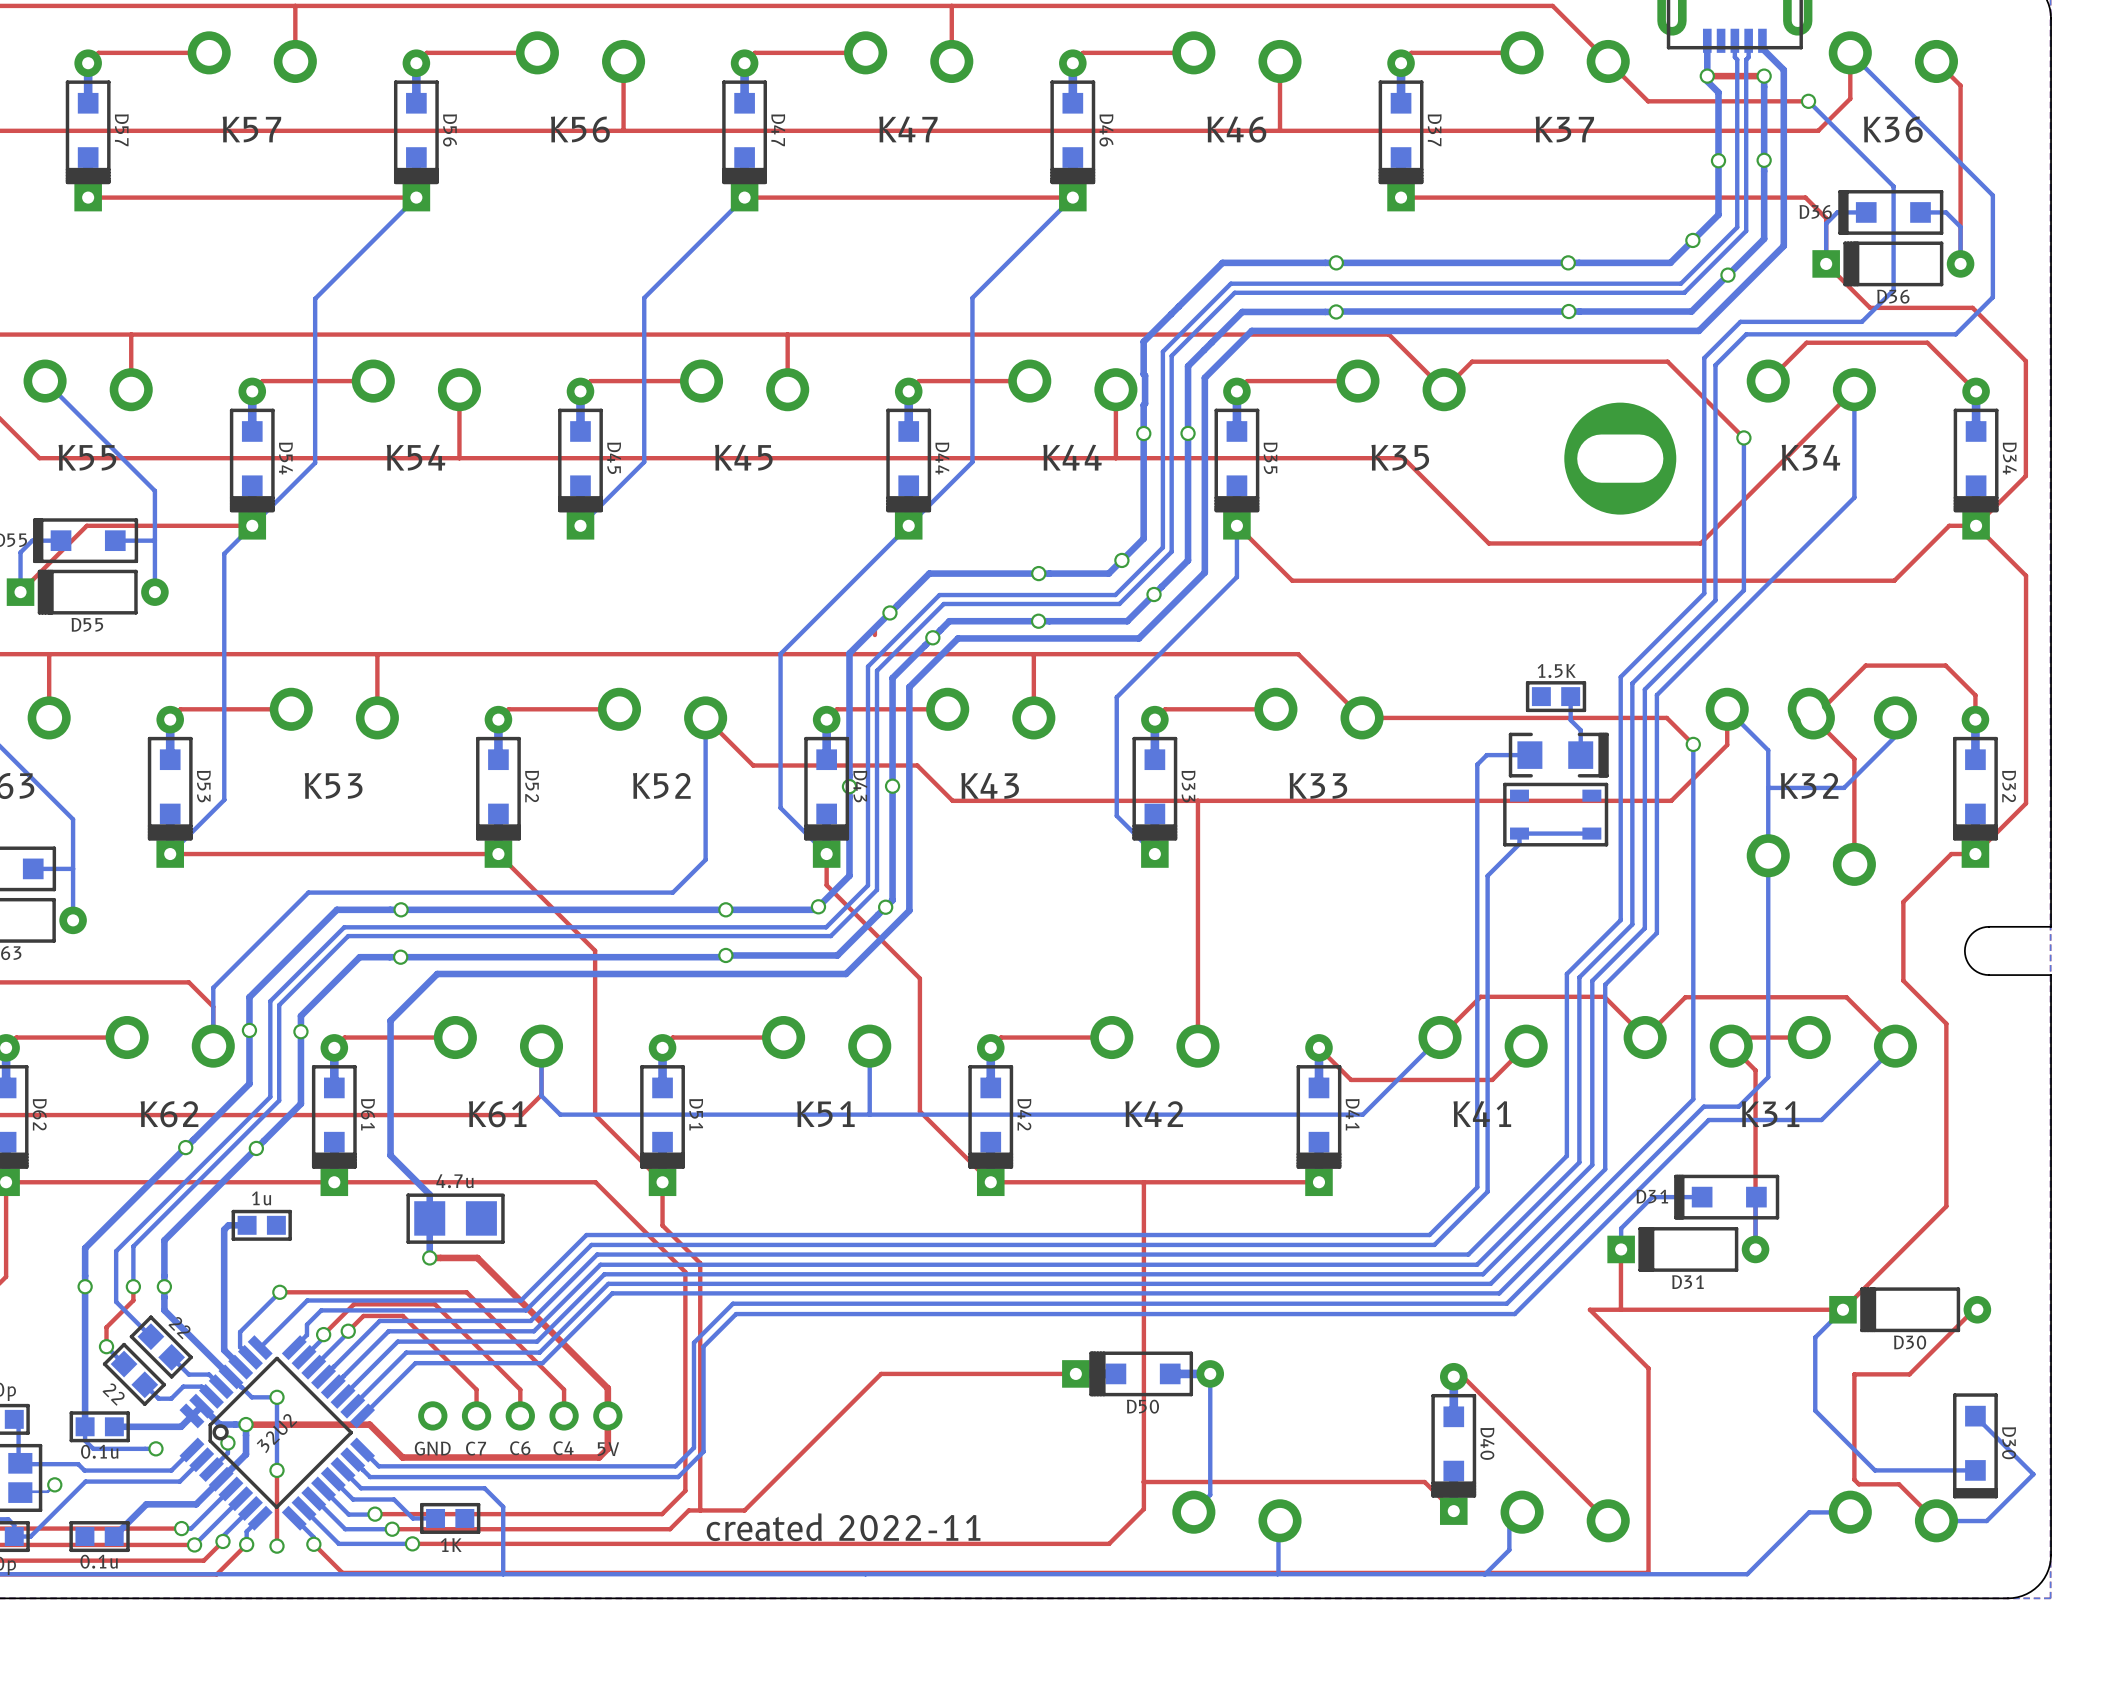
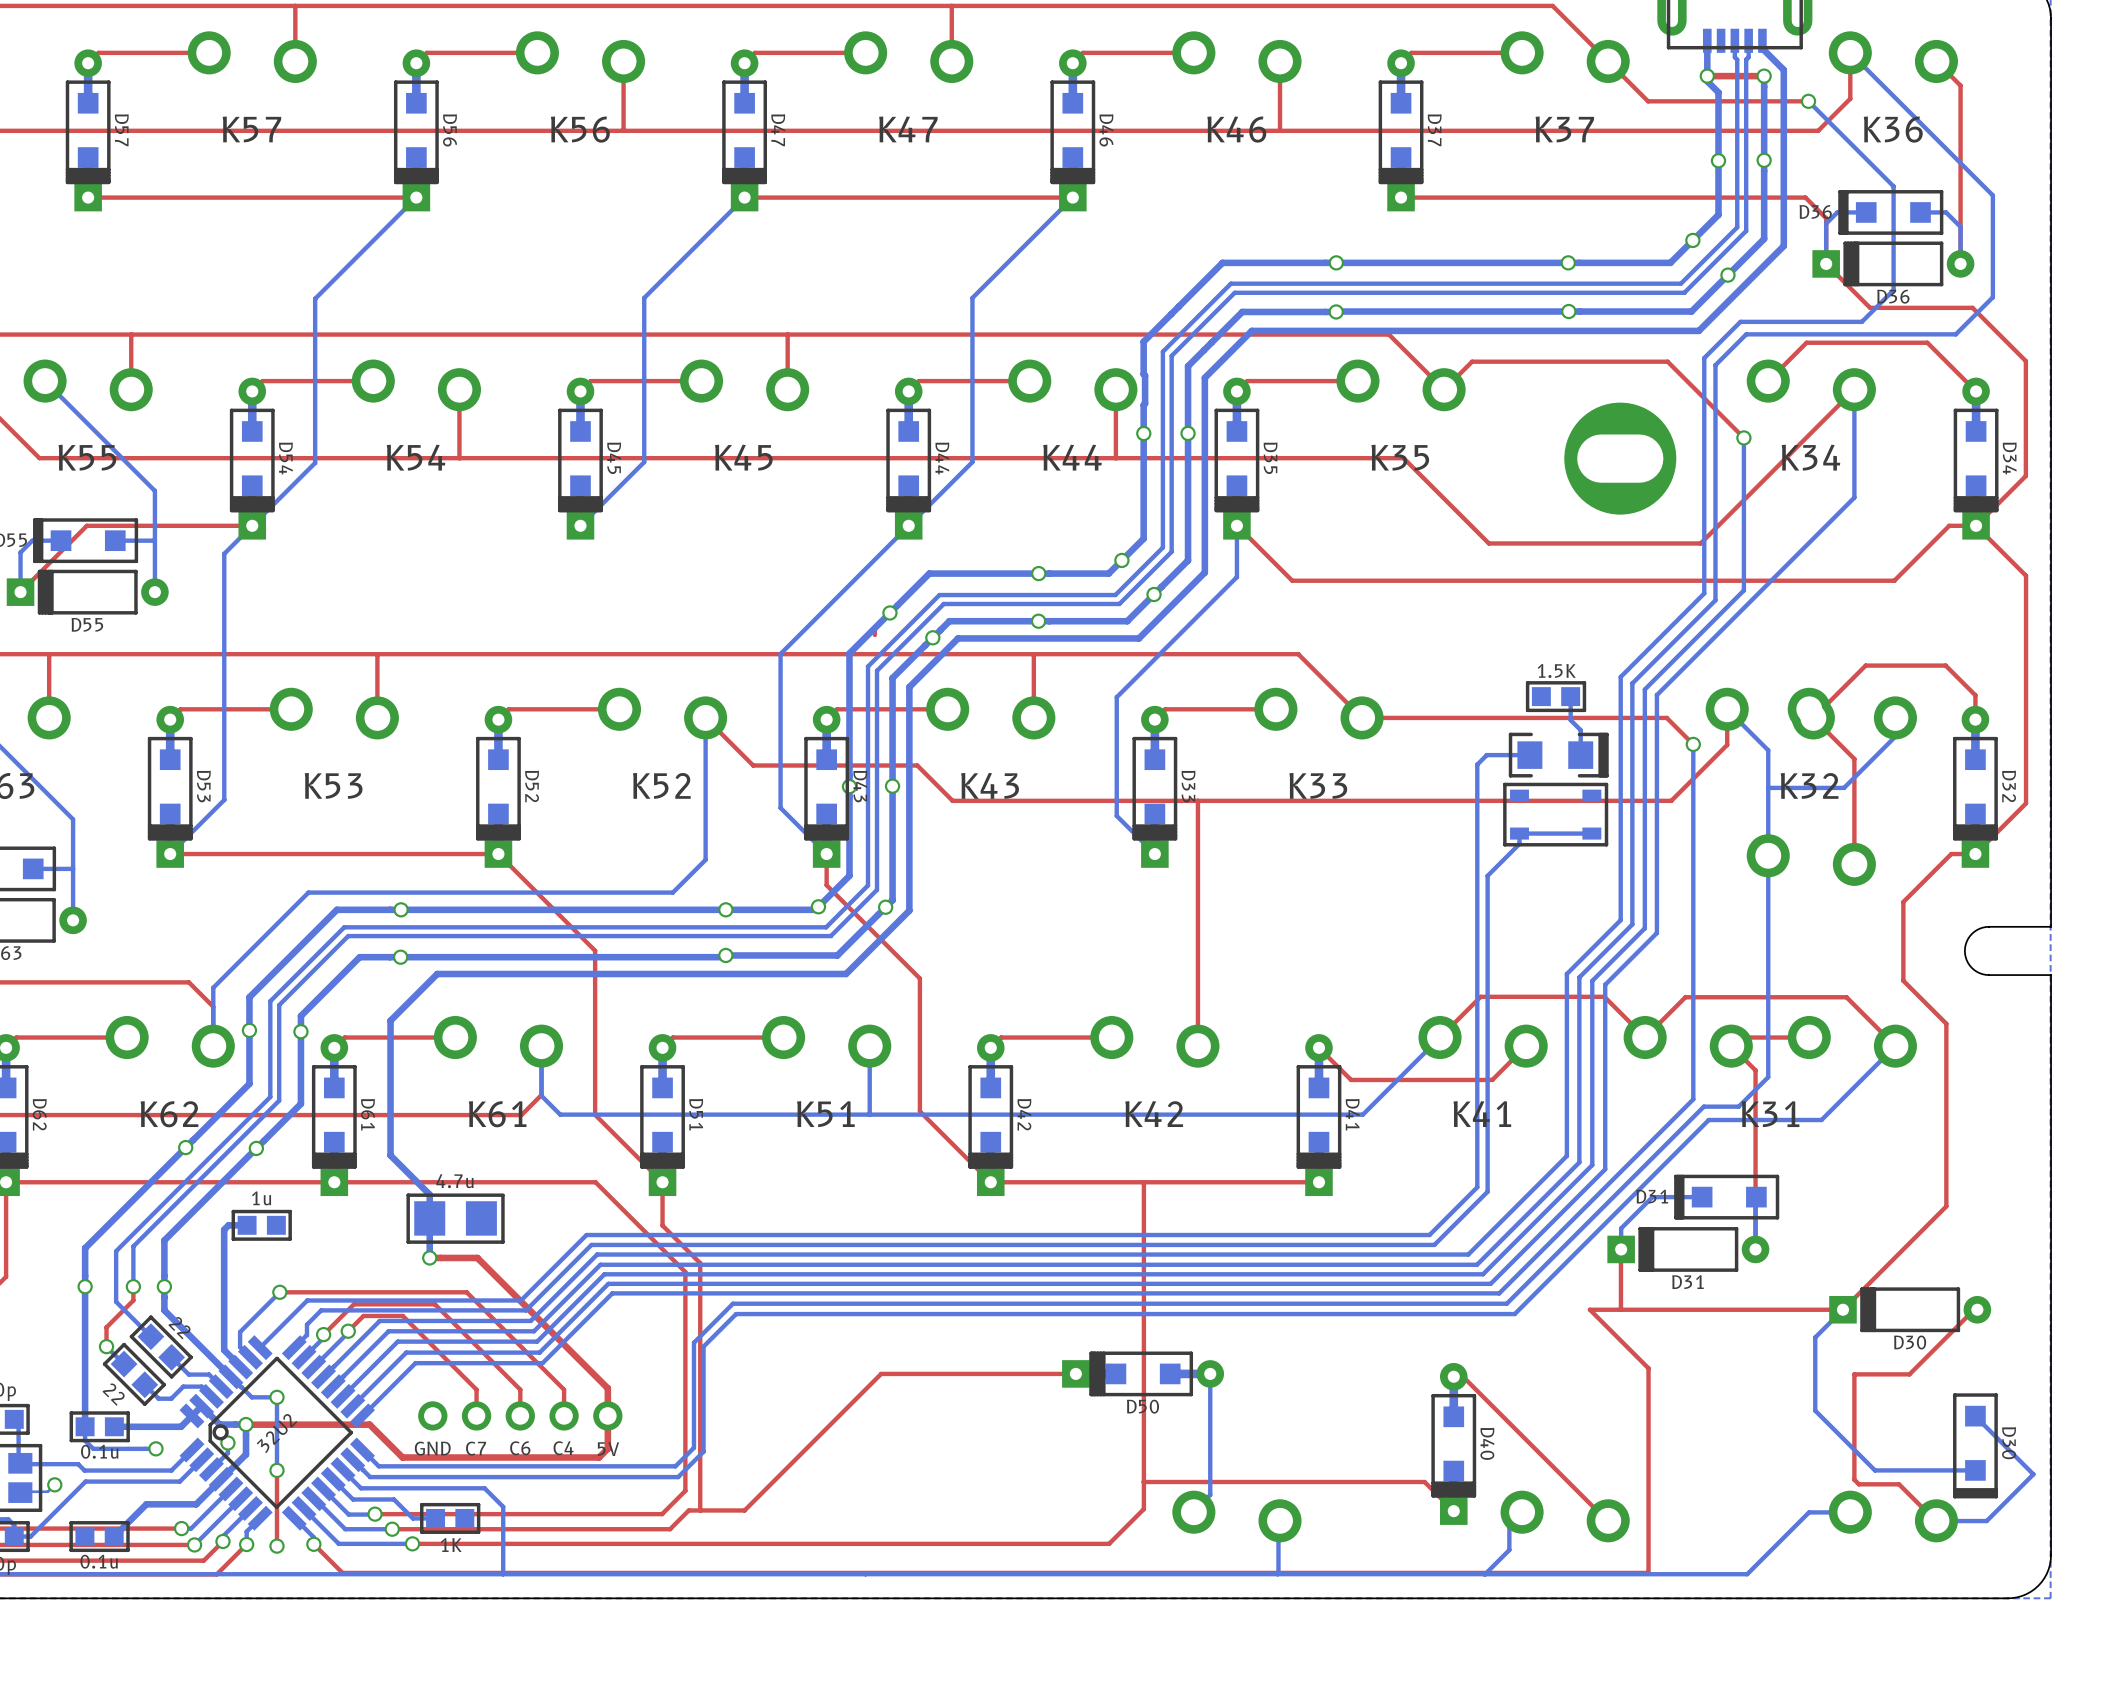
text: created 2022-11 (843, 1527) -> none

